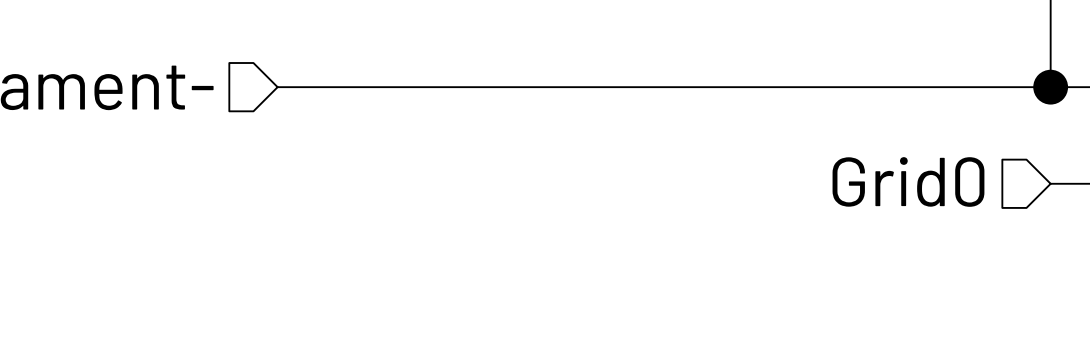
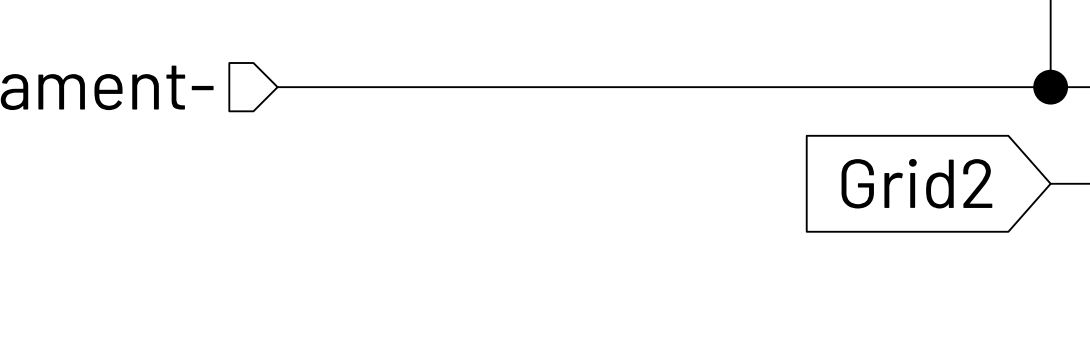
hierarchical label: Grid0 (908, 181) -> none
global label: none -> Grid2 (916, 183)

